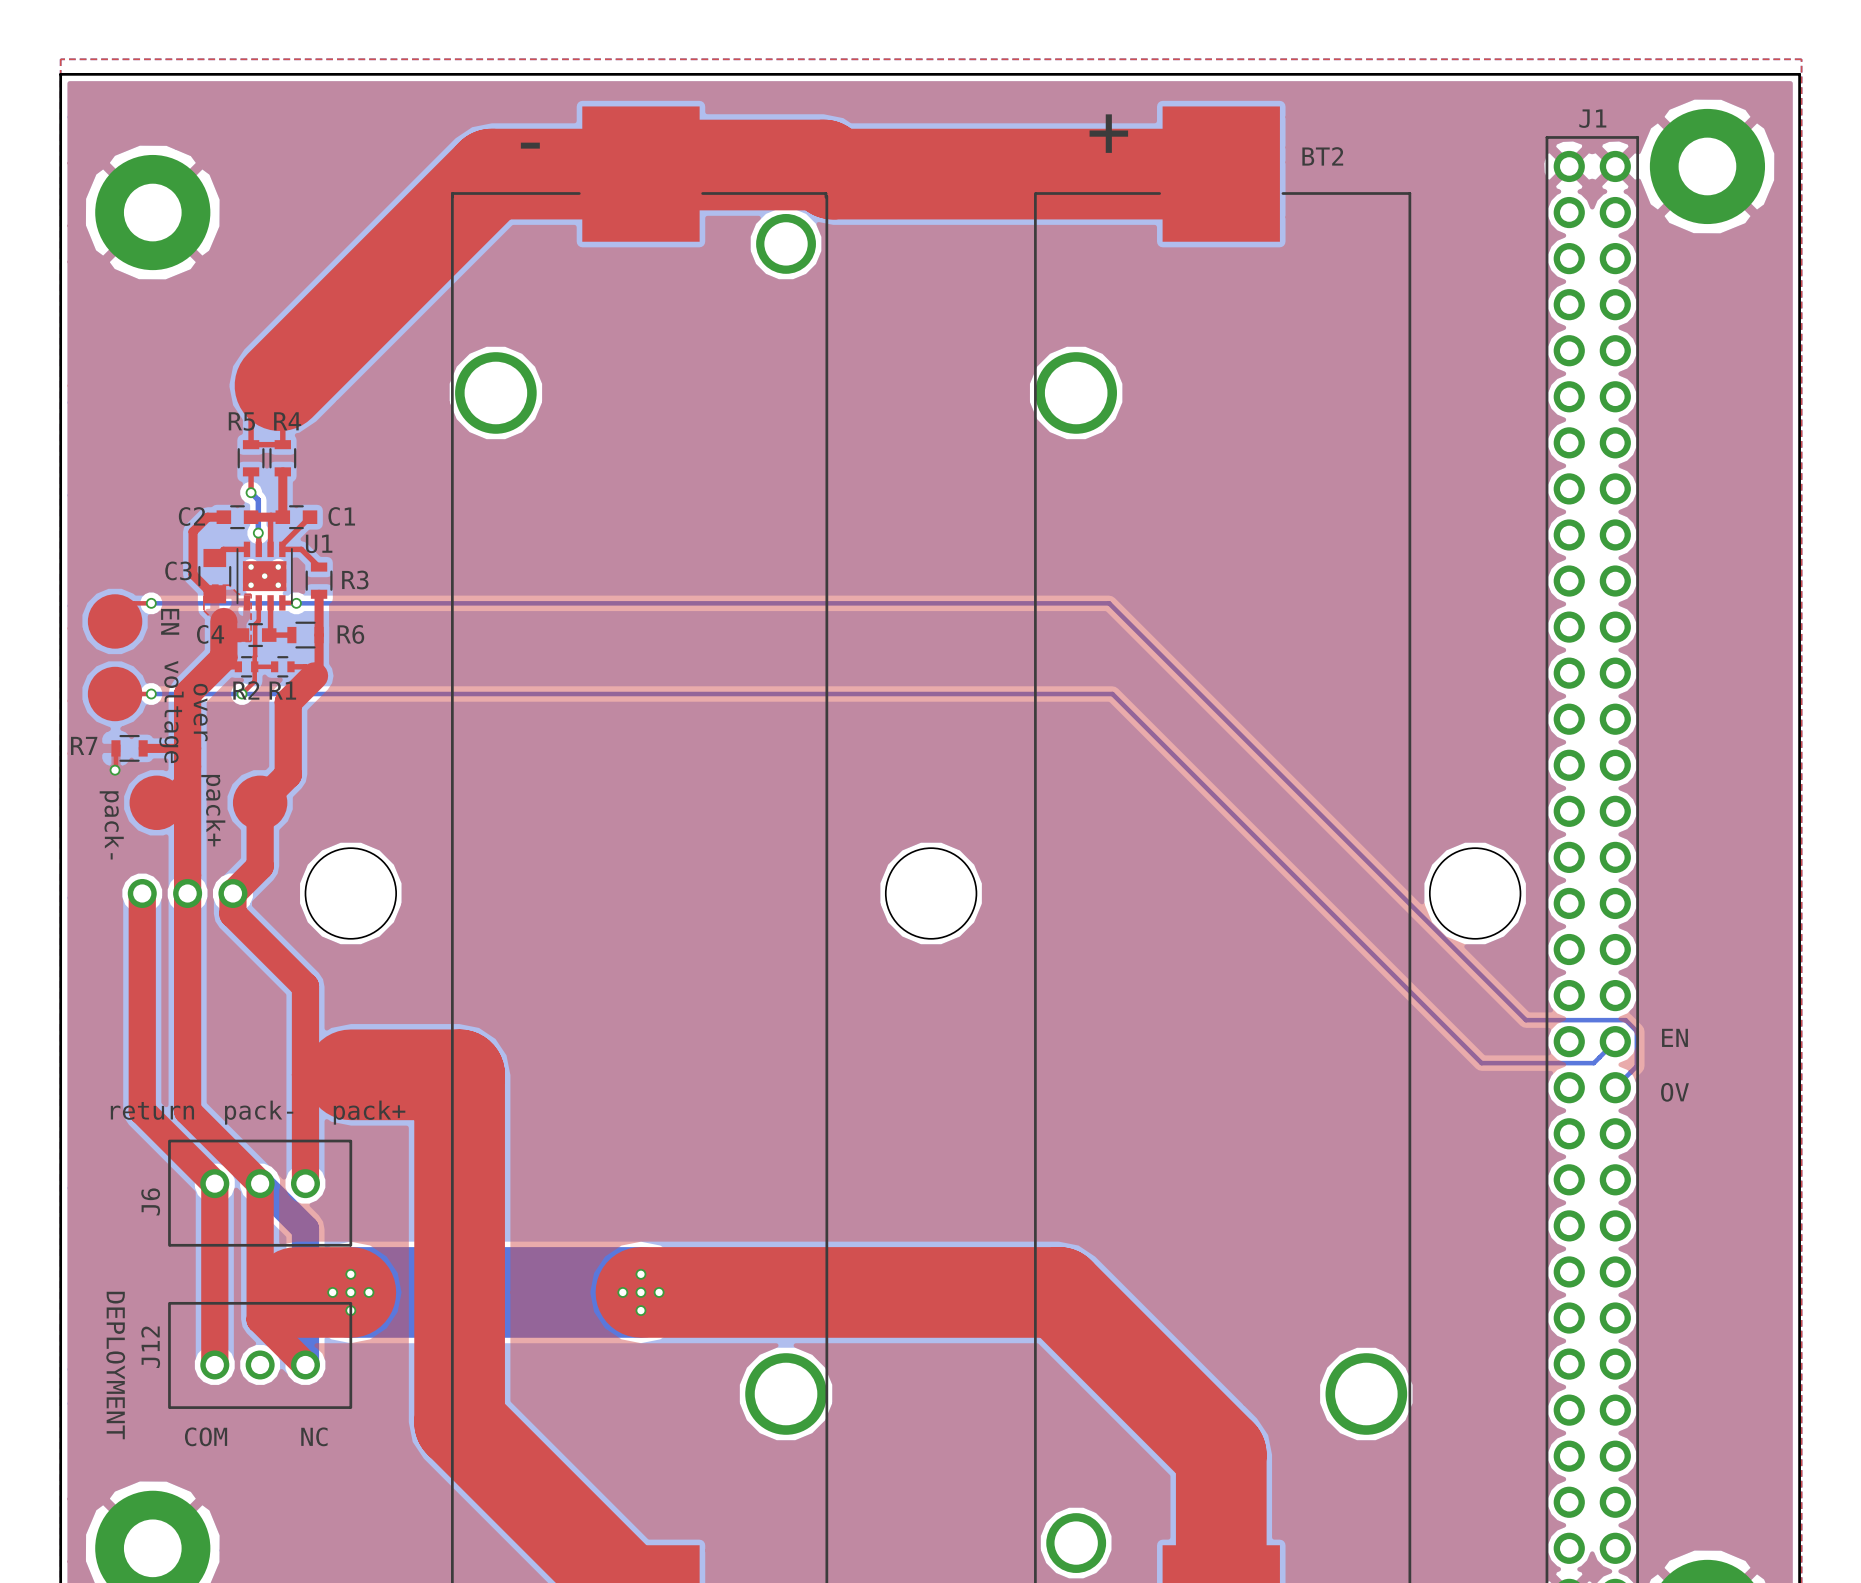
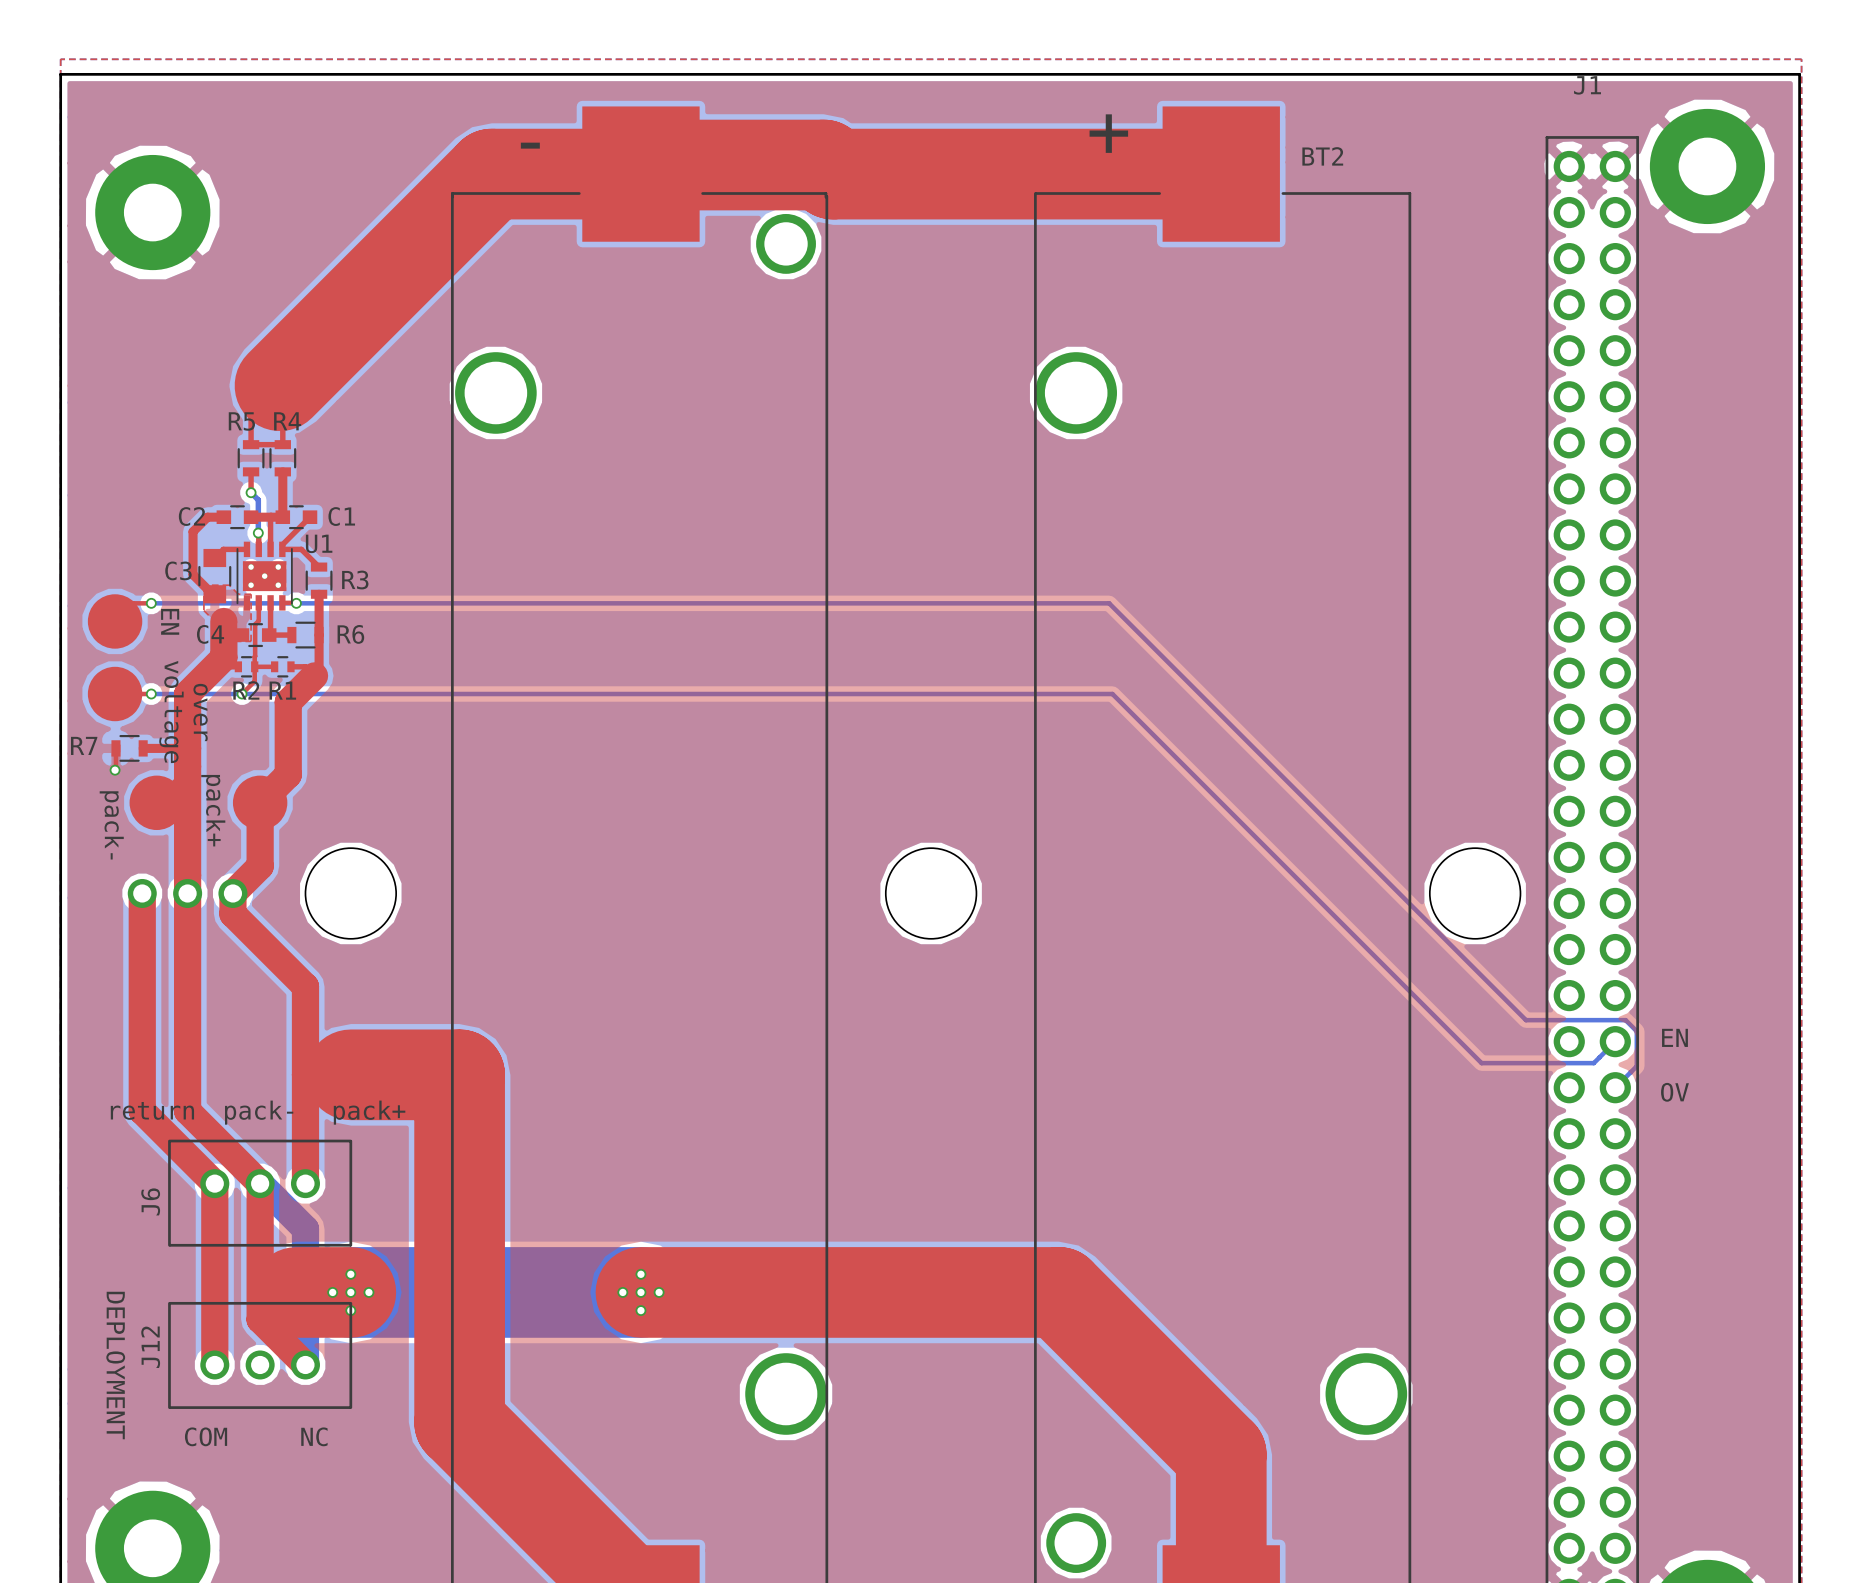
J1 name position: J1 (1592, 118) -> J1 (1587, 85)

